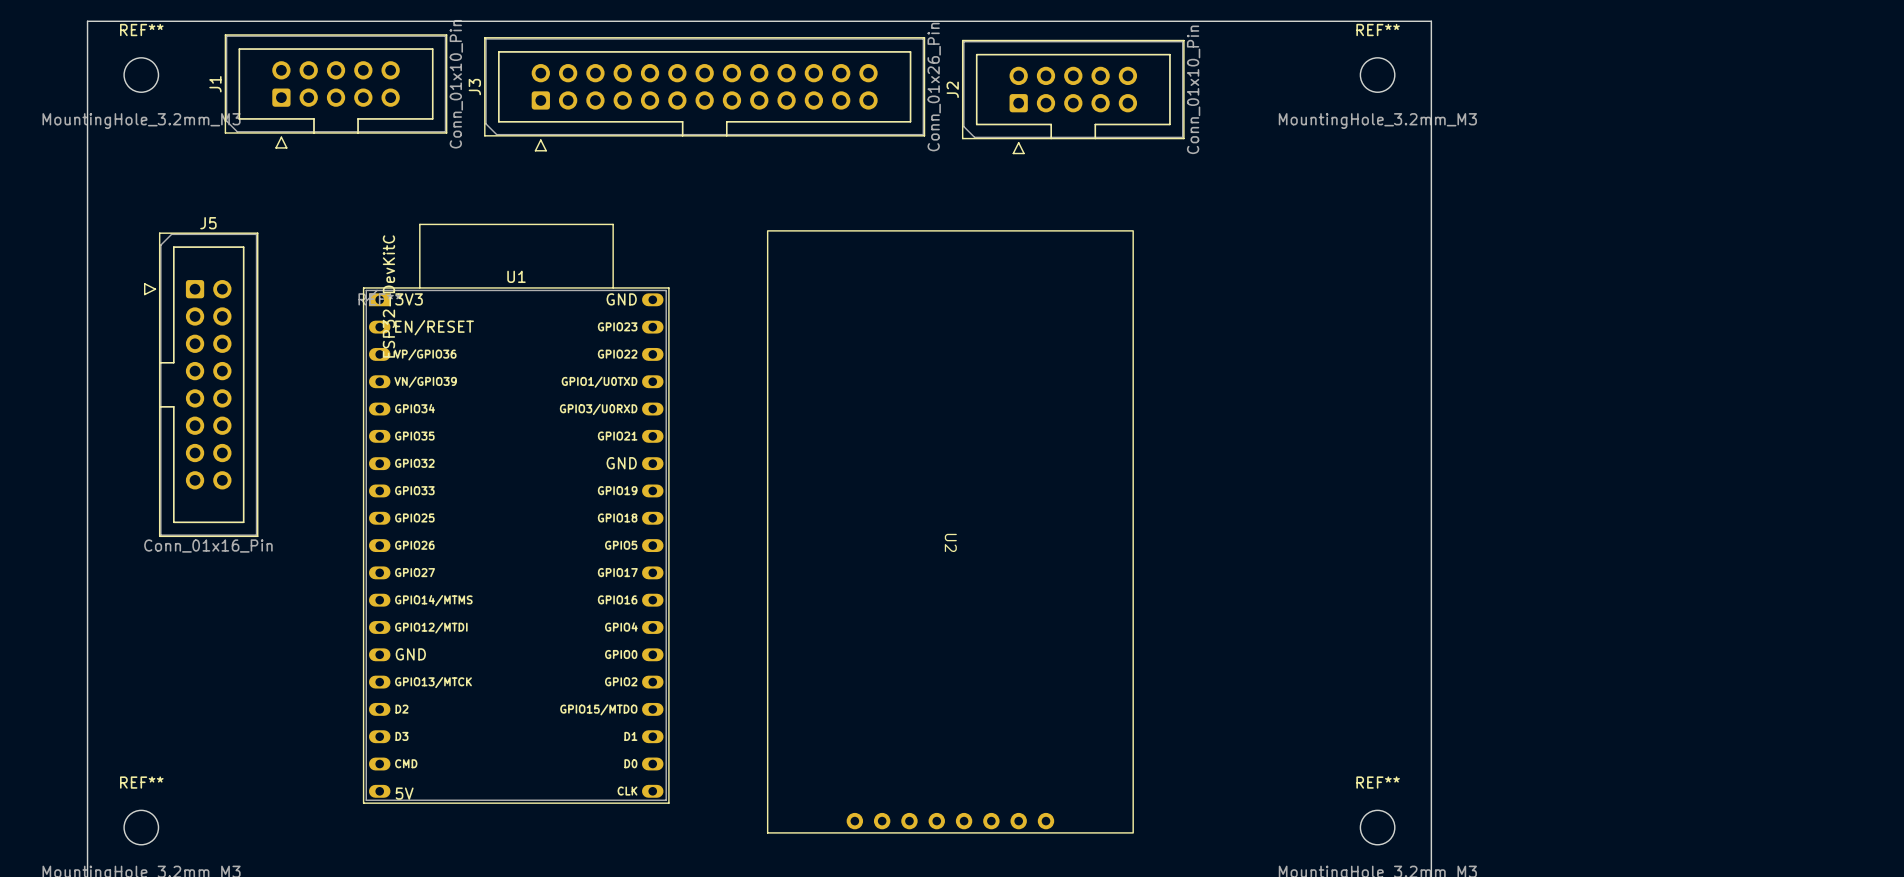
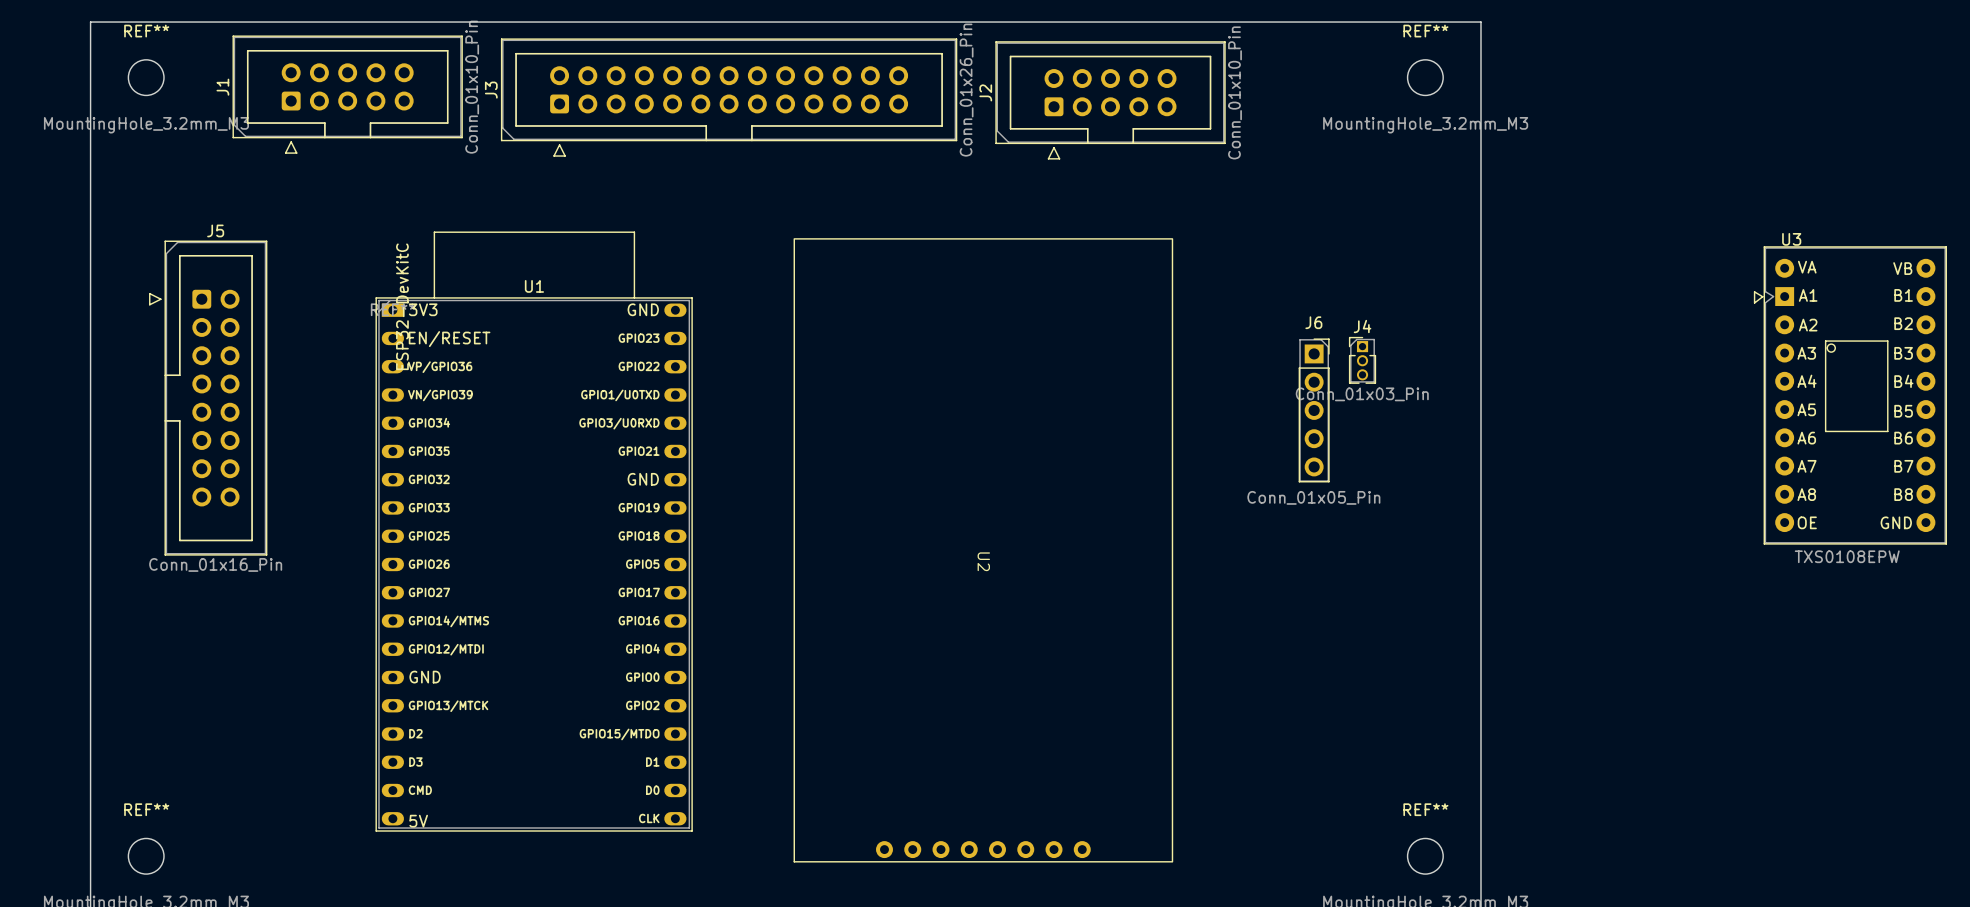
J4: none -> Conn_01x03_Pin (1362, 360)
U3: none -> TXS0108EPW (1850, 395)
J6: none -> Conn_01x05_Pin (1314, 410)

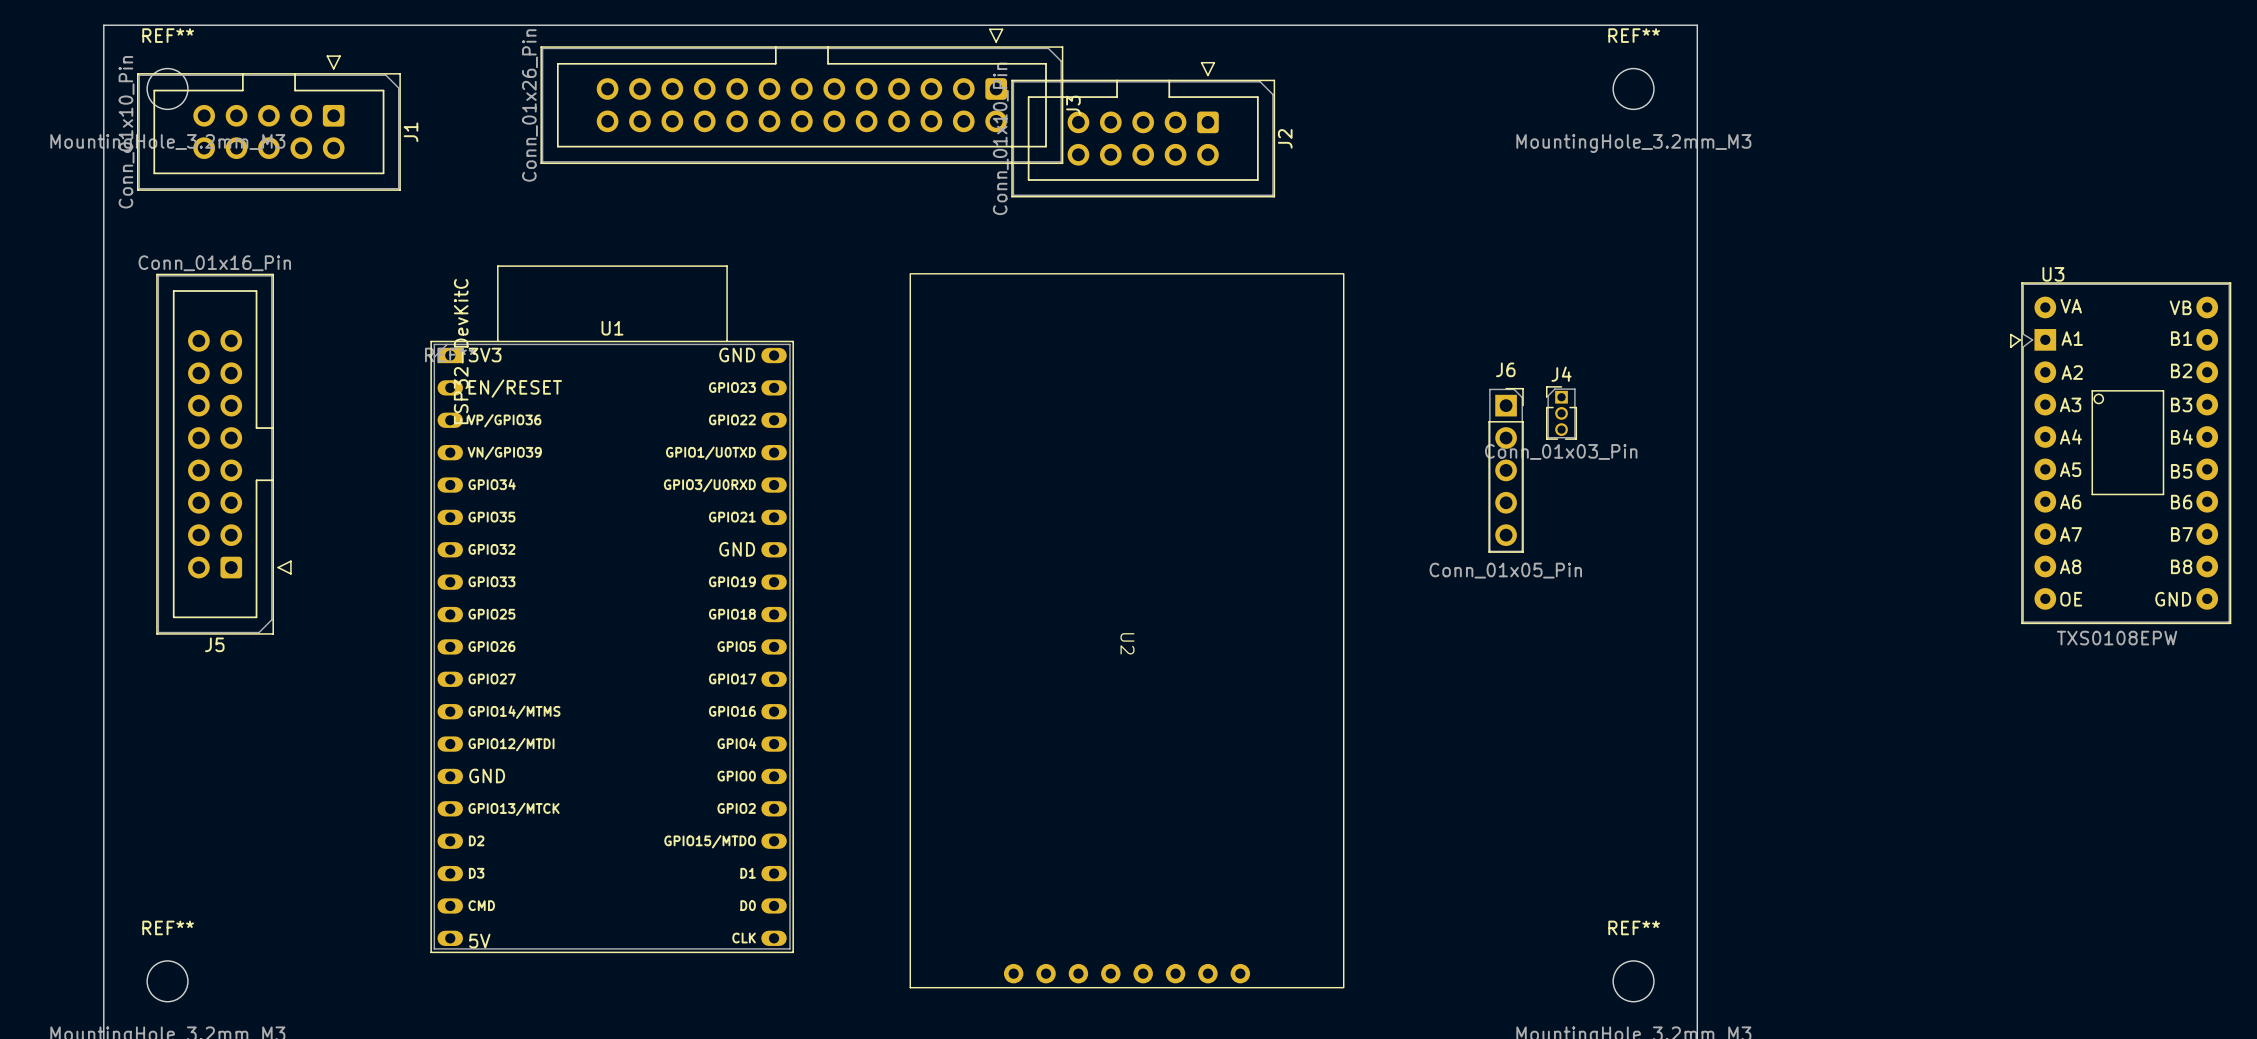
J1 rotation: 0° (347, 94) -> 180° (268, 123)
J3 rotation: 0° (729, 97) -> 180° (801, 96)
J2 rotation: 0° (1110, 100) -> 180° (1143, 129)
J5 rotation: 0° (208, 398) -> 180° (223, 454)

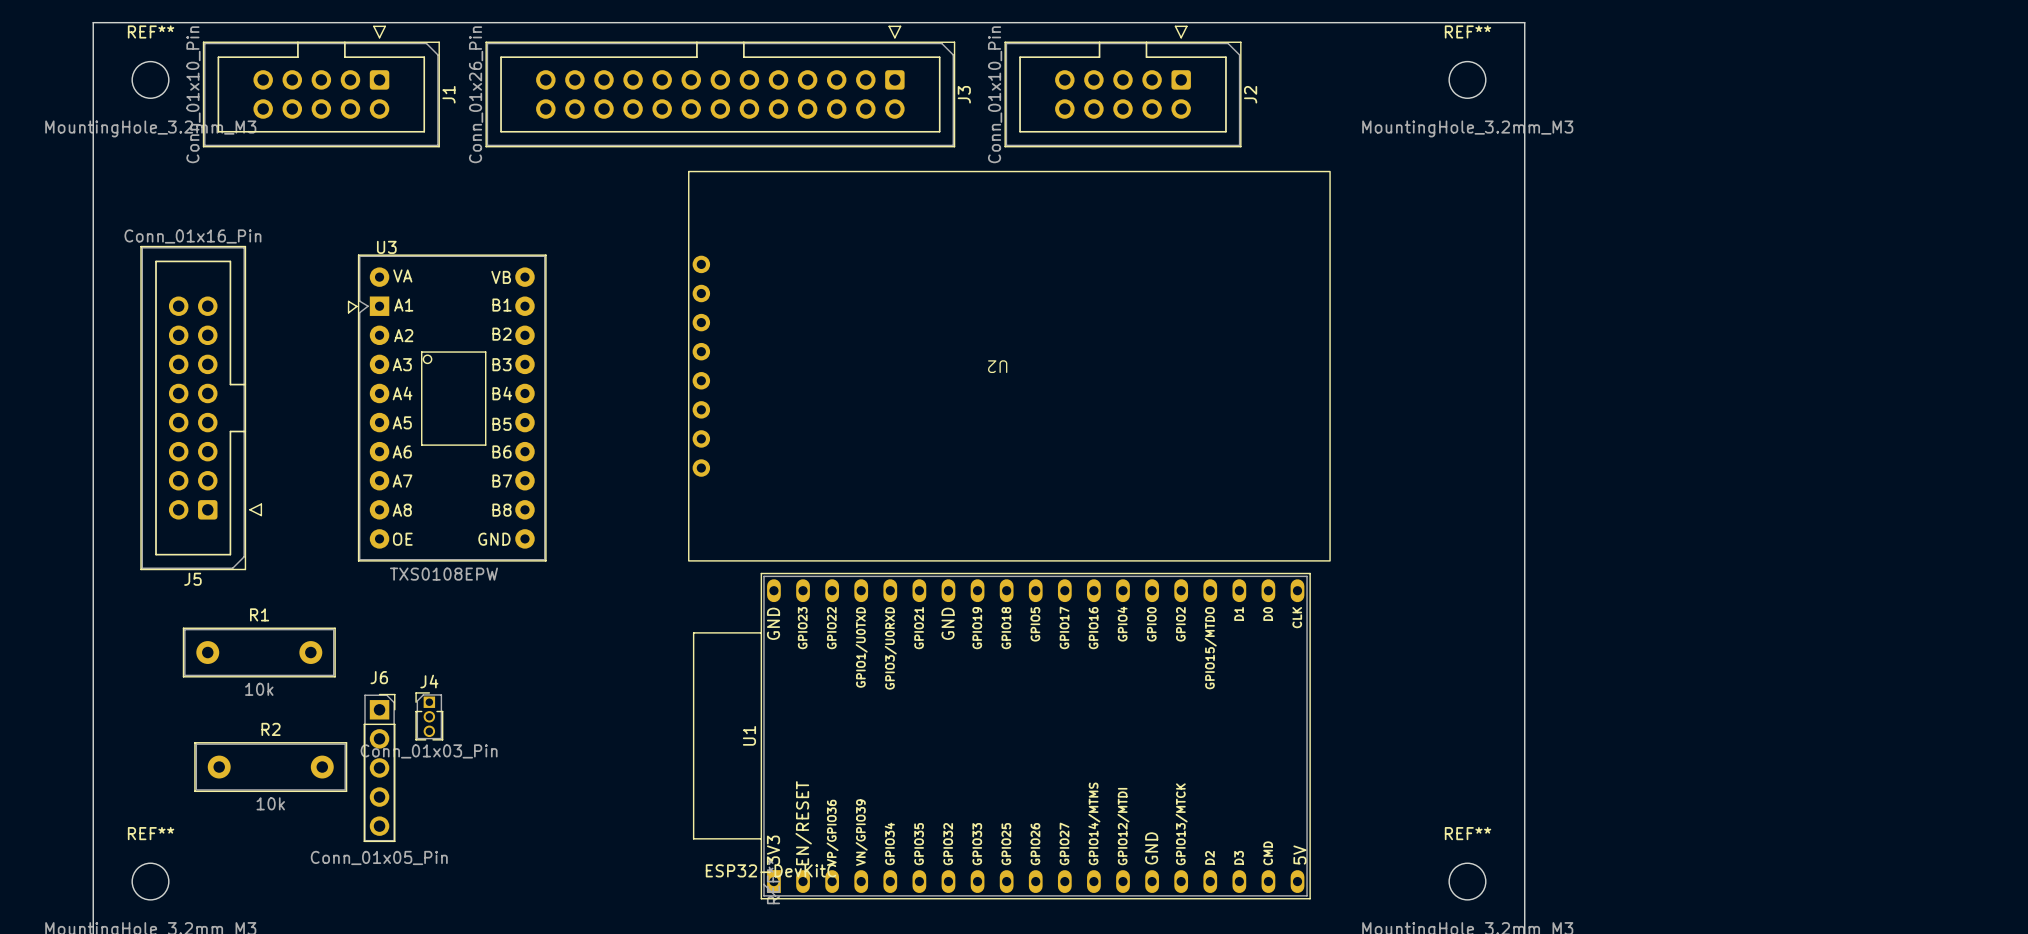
J1 position: (268, 123) -> (321, 86)
J2 position: (1143, 129) -> (1123, 86)
J4 position: (1561, 412) -> (429, 716)
U3 position: (2120, 453) -> (447, 408)
J6 position: (1506, 470) -> (379, 767)
U1 rotation: 0° (612, 609) -> 90° counterclockwise (1001, 736)
U1 position: (612, 609) -> (1001, 736)
U2 rotation: 0° (1127, 630) -> 90° clockwise (1009, 366)
R1: none -> 10k (259, 652)
R2: none -> 10k (270, 767)

